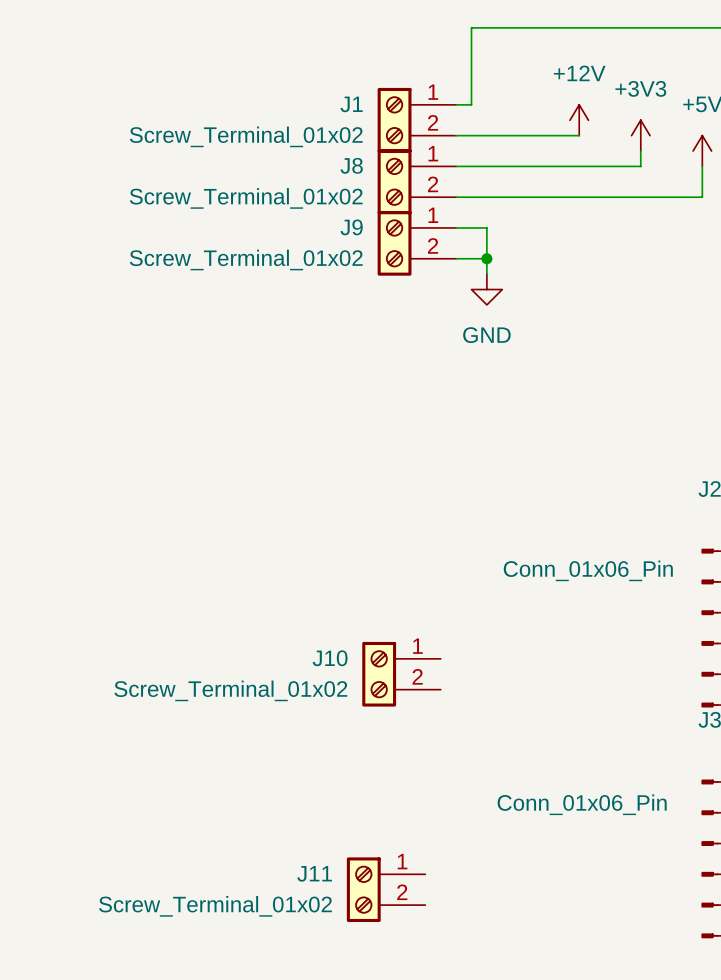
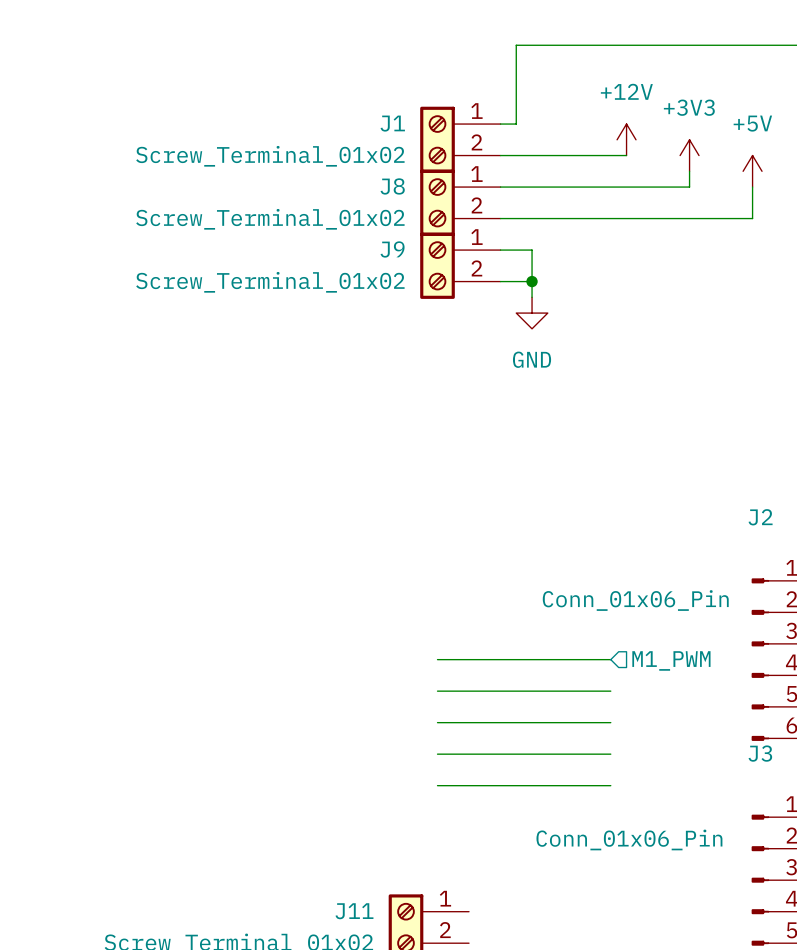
wire: none -> (437, 659) (610, 659)
sheet pin: none -> M1_PWM (671, 660)
wire: none -> (437, 691) (610, 691)
J10: Screw_Terminal_01x02 (401, 674) -> none
wire: none -> (437, 722) (610, 722)
wire: none -> (437, 754) (610, 754)
wire: none -> (437, 785) (610, 785)

